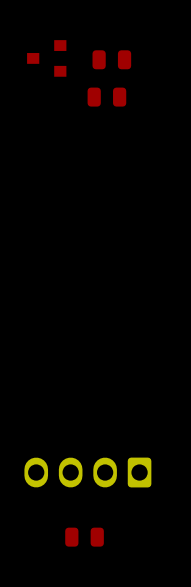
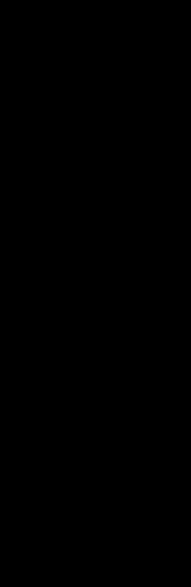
part: (46, 58) -> none
part: (111, 59) -> none
part: (106, 97) -> none
part: (87, 472) -> none
part: (84, 537) -> none

